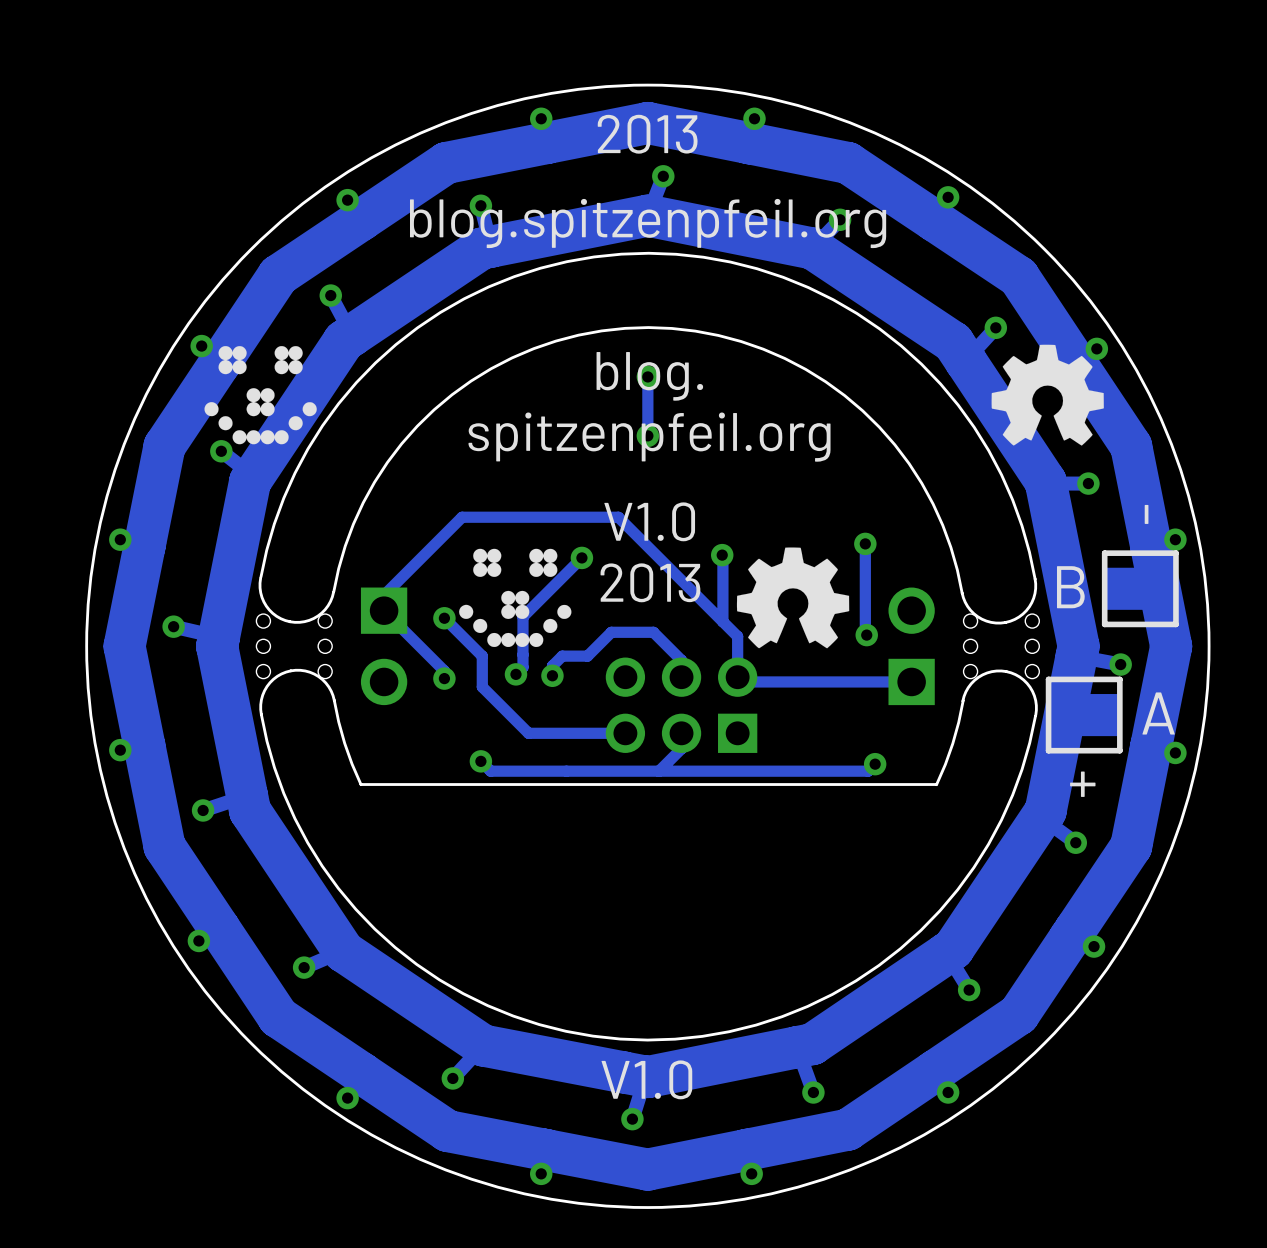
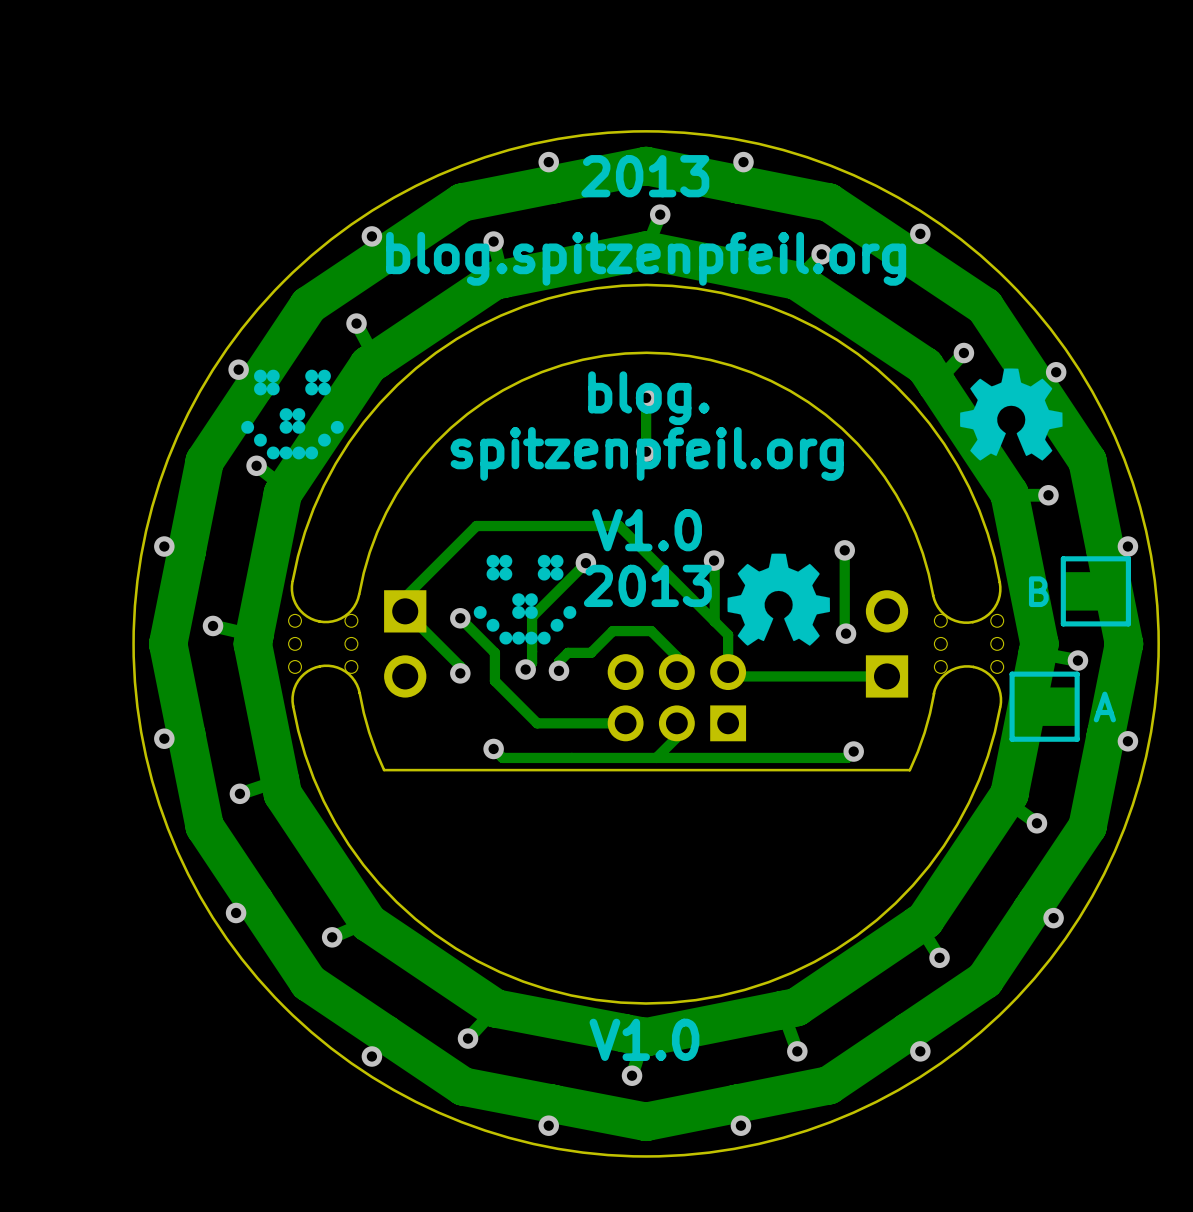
text: - (1146, 514) -> none
text: B (1070, 587) -> none
part value: none -> B (1038, 591)
text: A (1158, 713) -> none
part value: none -> A (1104, 707)
text: + (1082, 784) -> none

